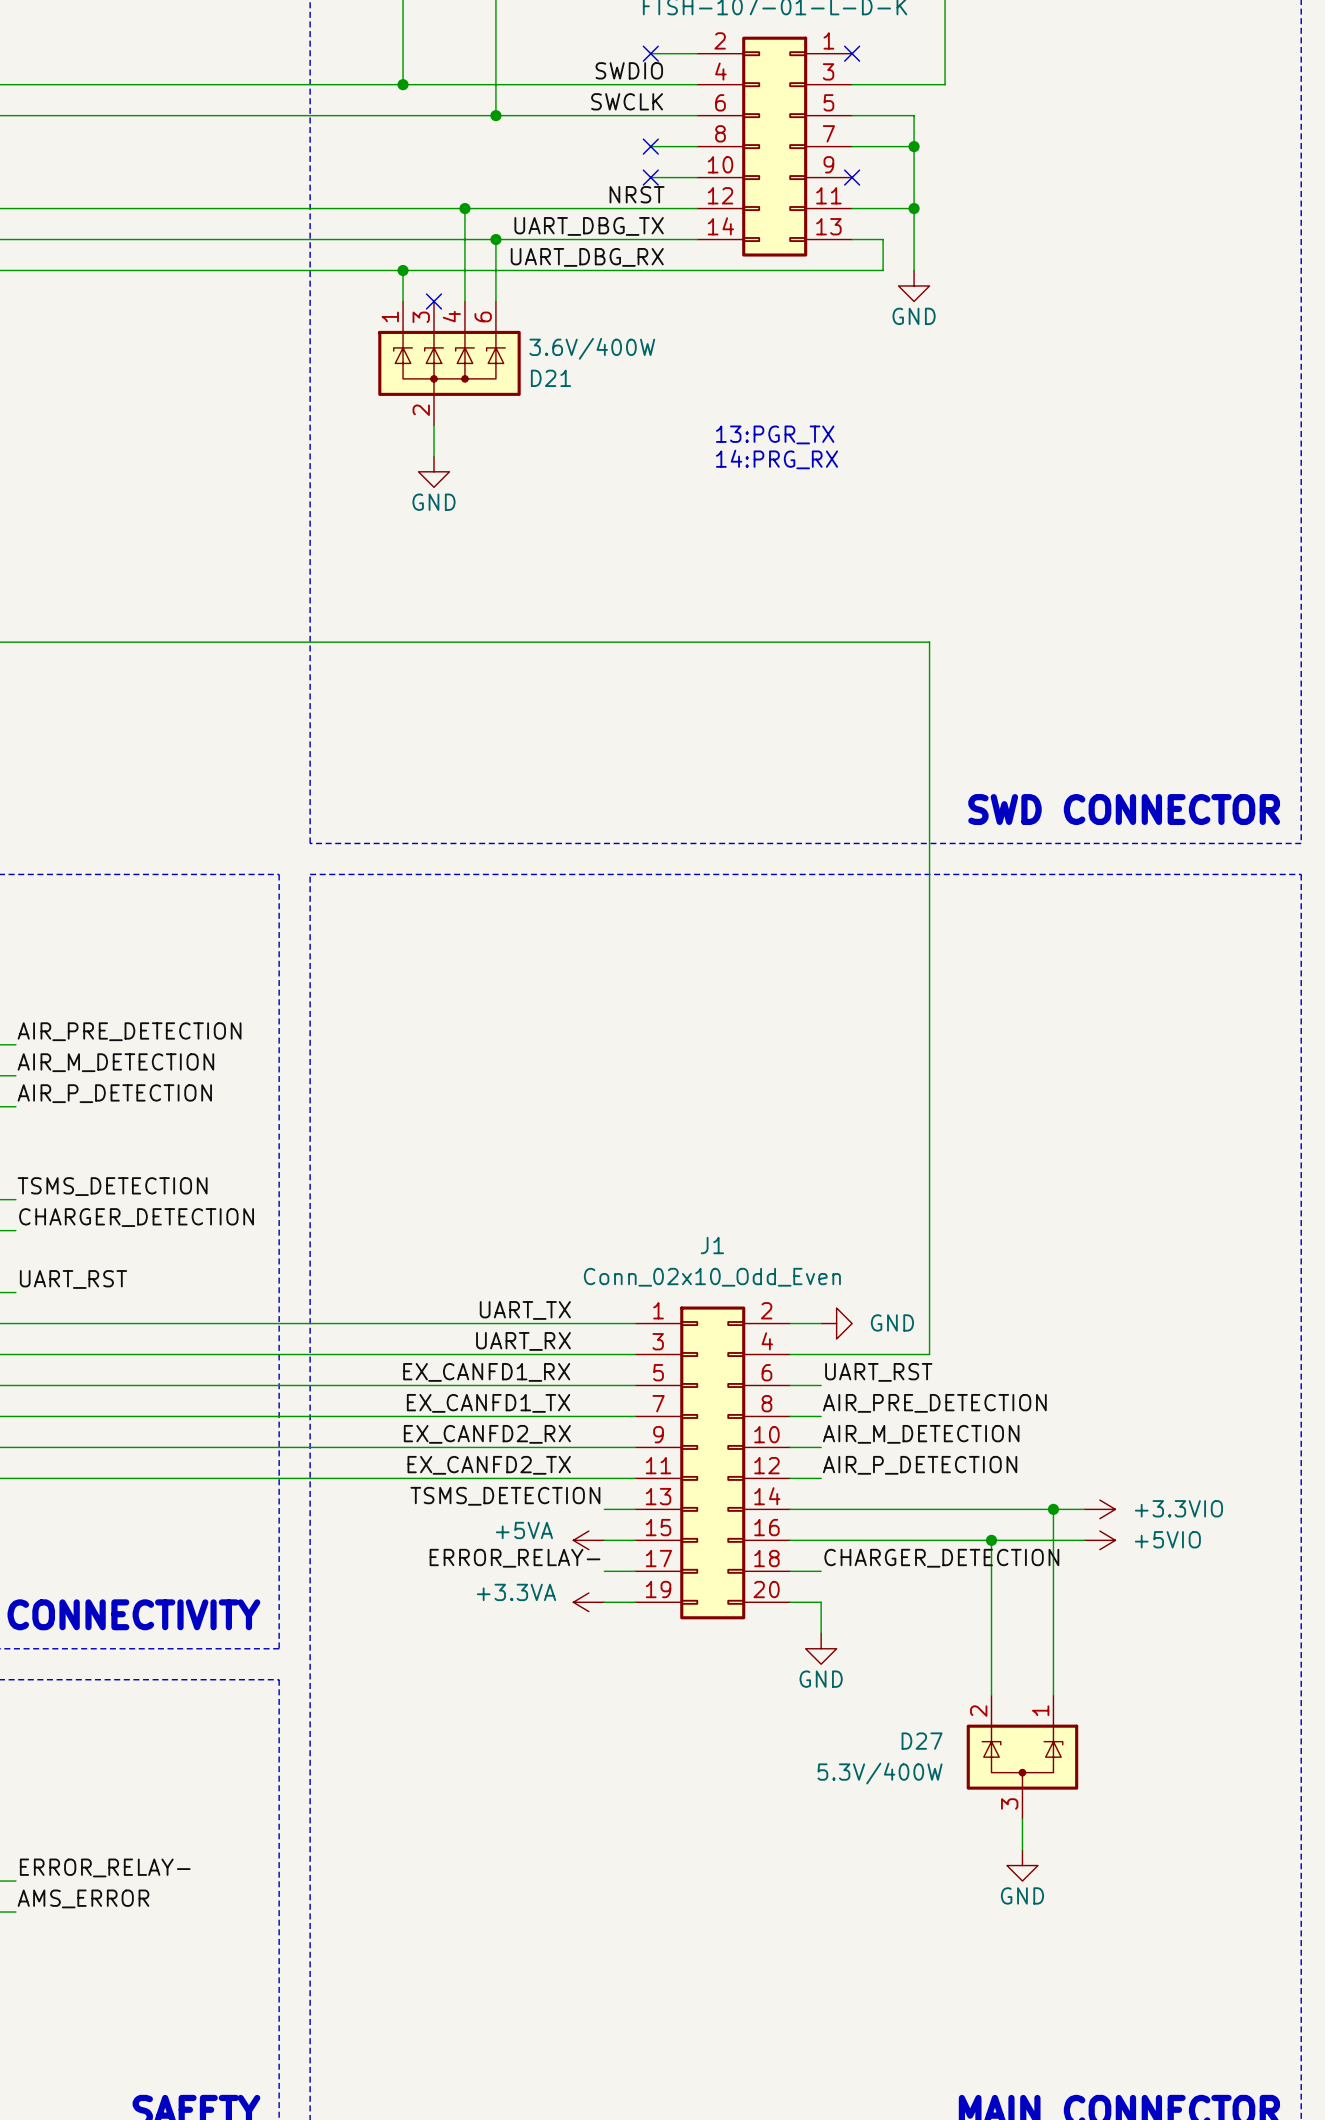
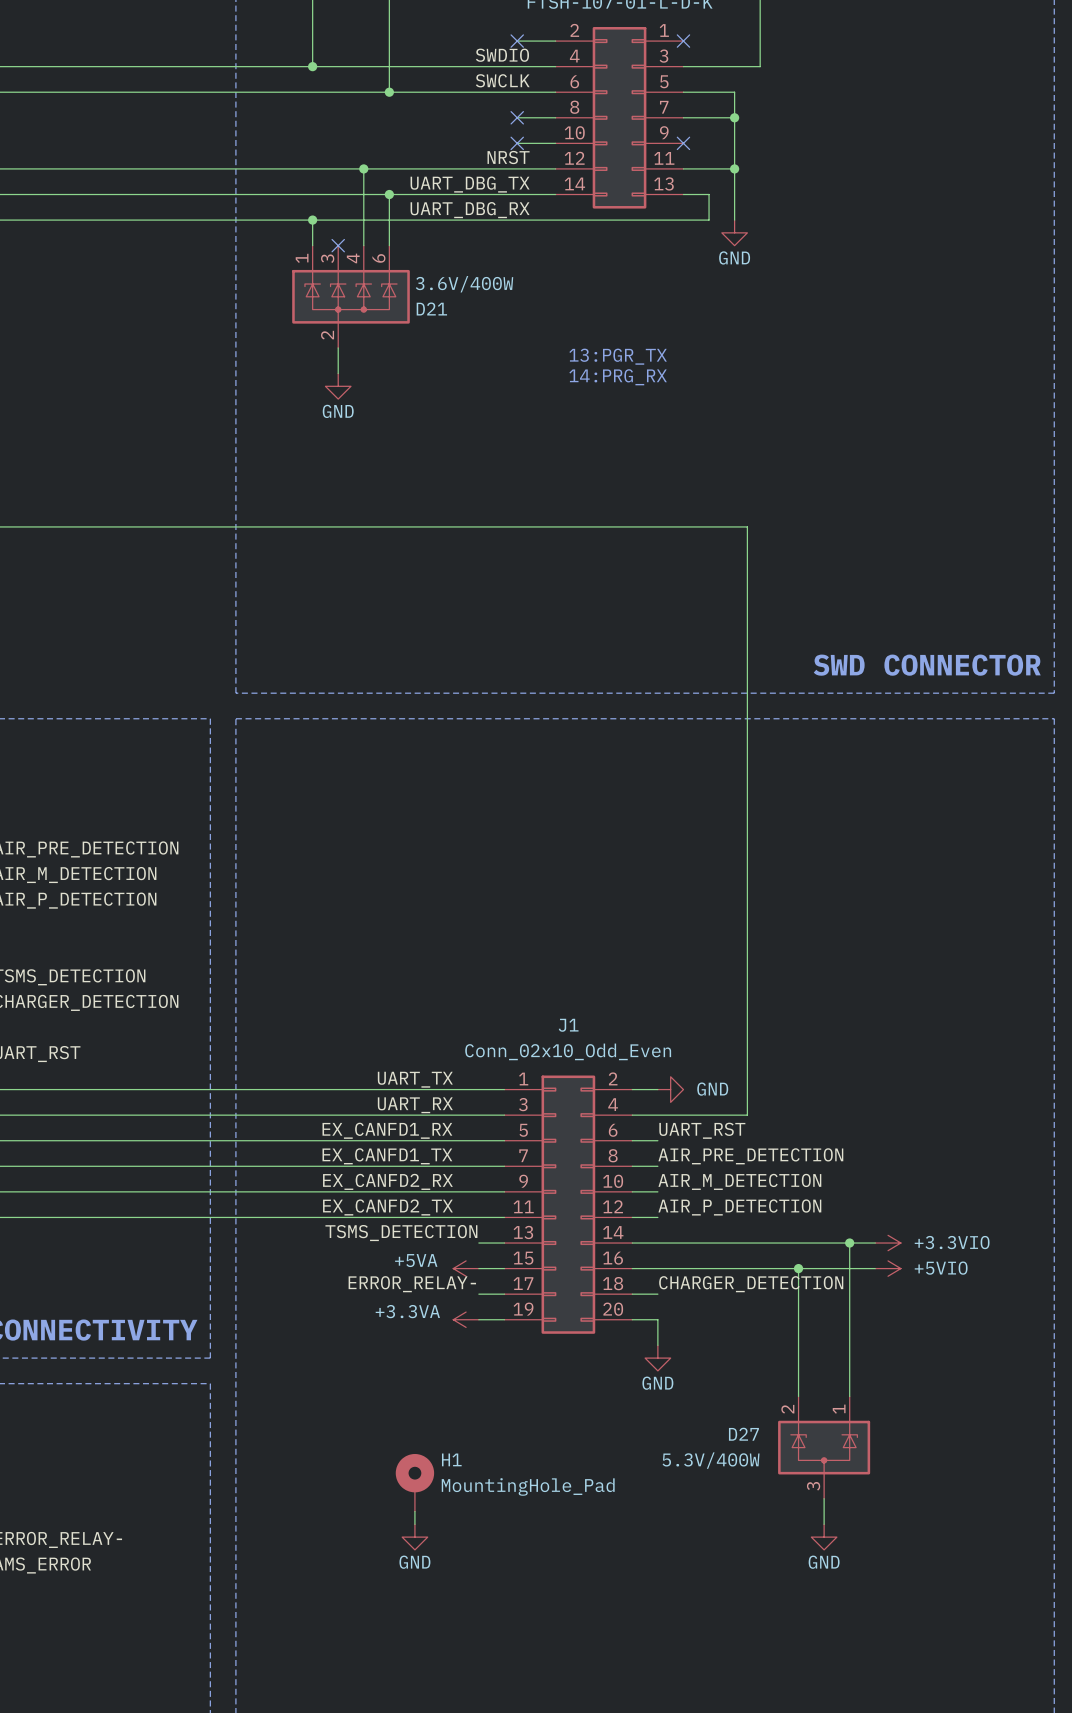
H1: none -> MountingHole_Pad (414, 1482)
wire: none -> (414, 1511) (414, 1524)
power symbol: none -> GND (414, 1537)

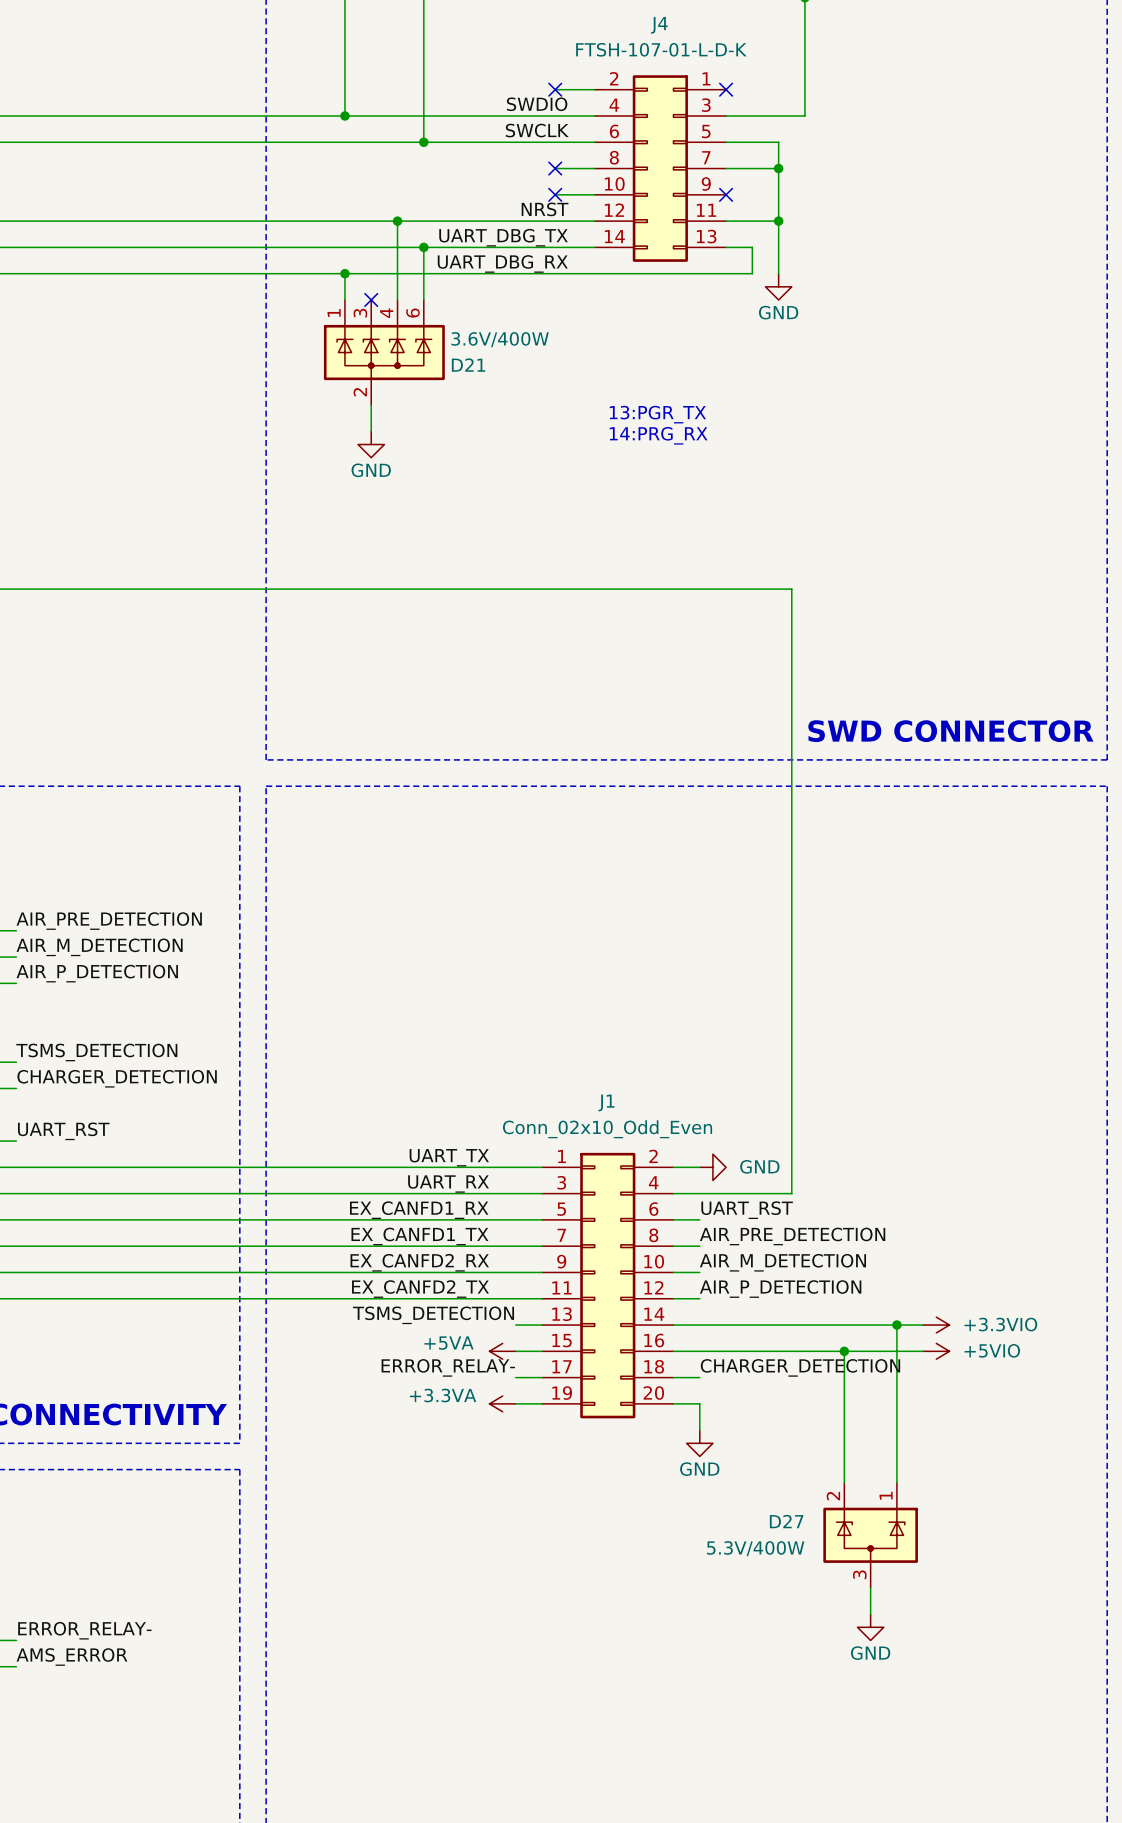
H1: MountingHole_Pad (414, 1482) -> none
wire: (414, 1511) (414, 1524) -> none
power symbol: GND (414, 1537) -> none

